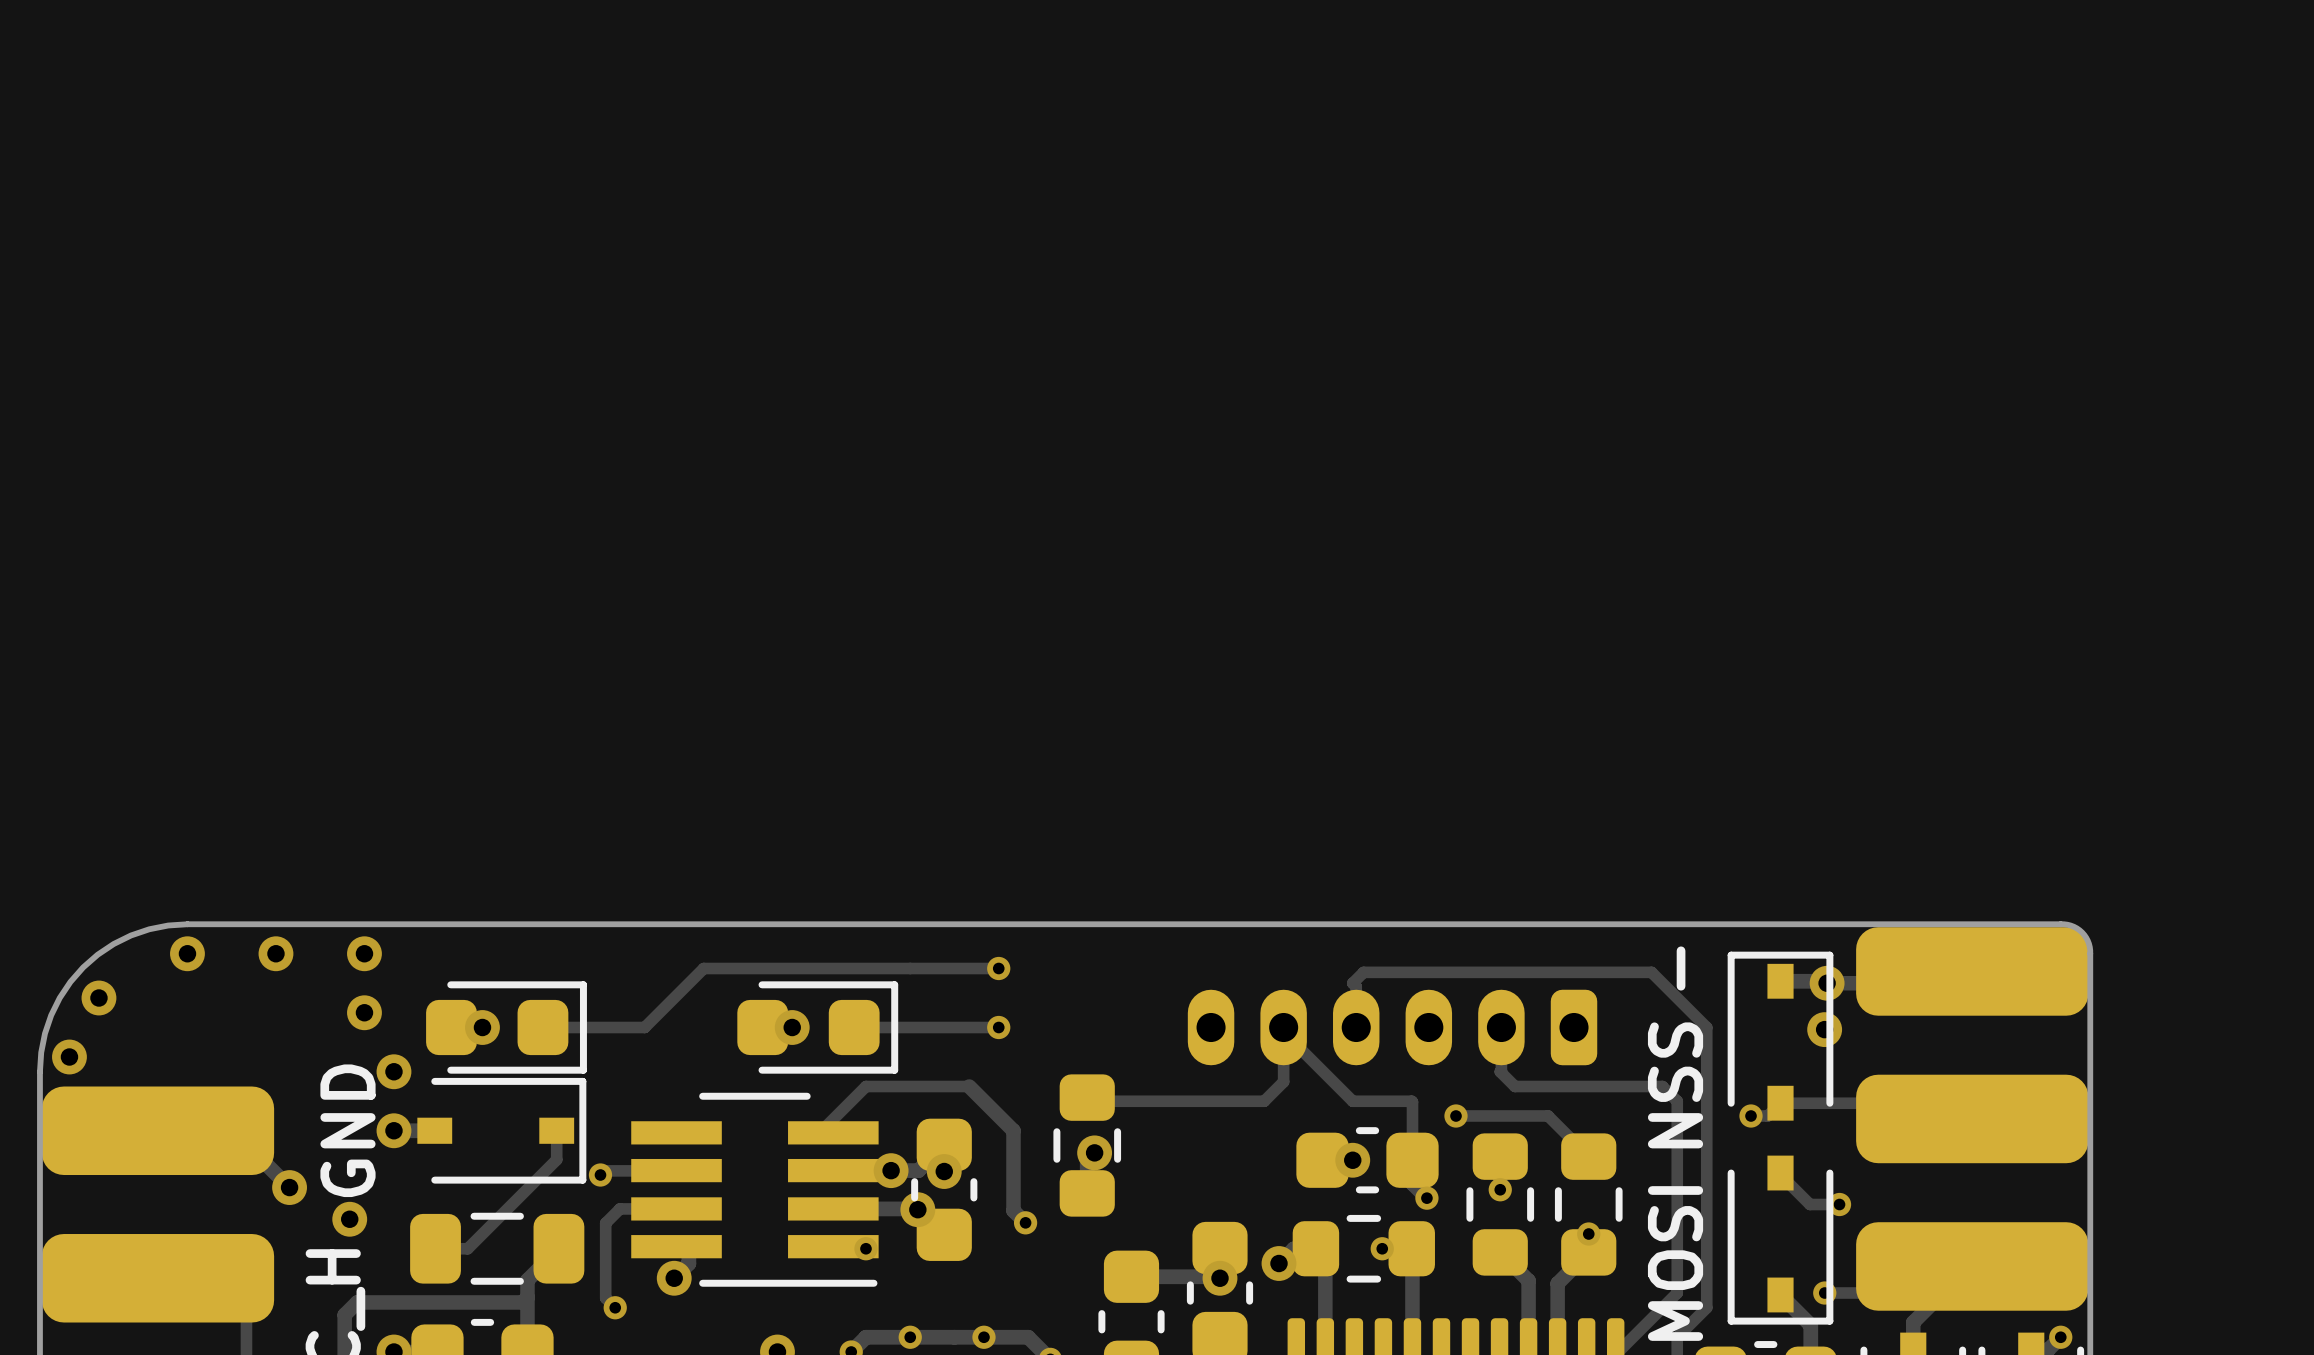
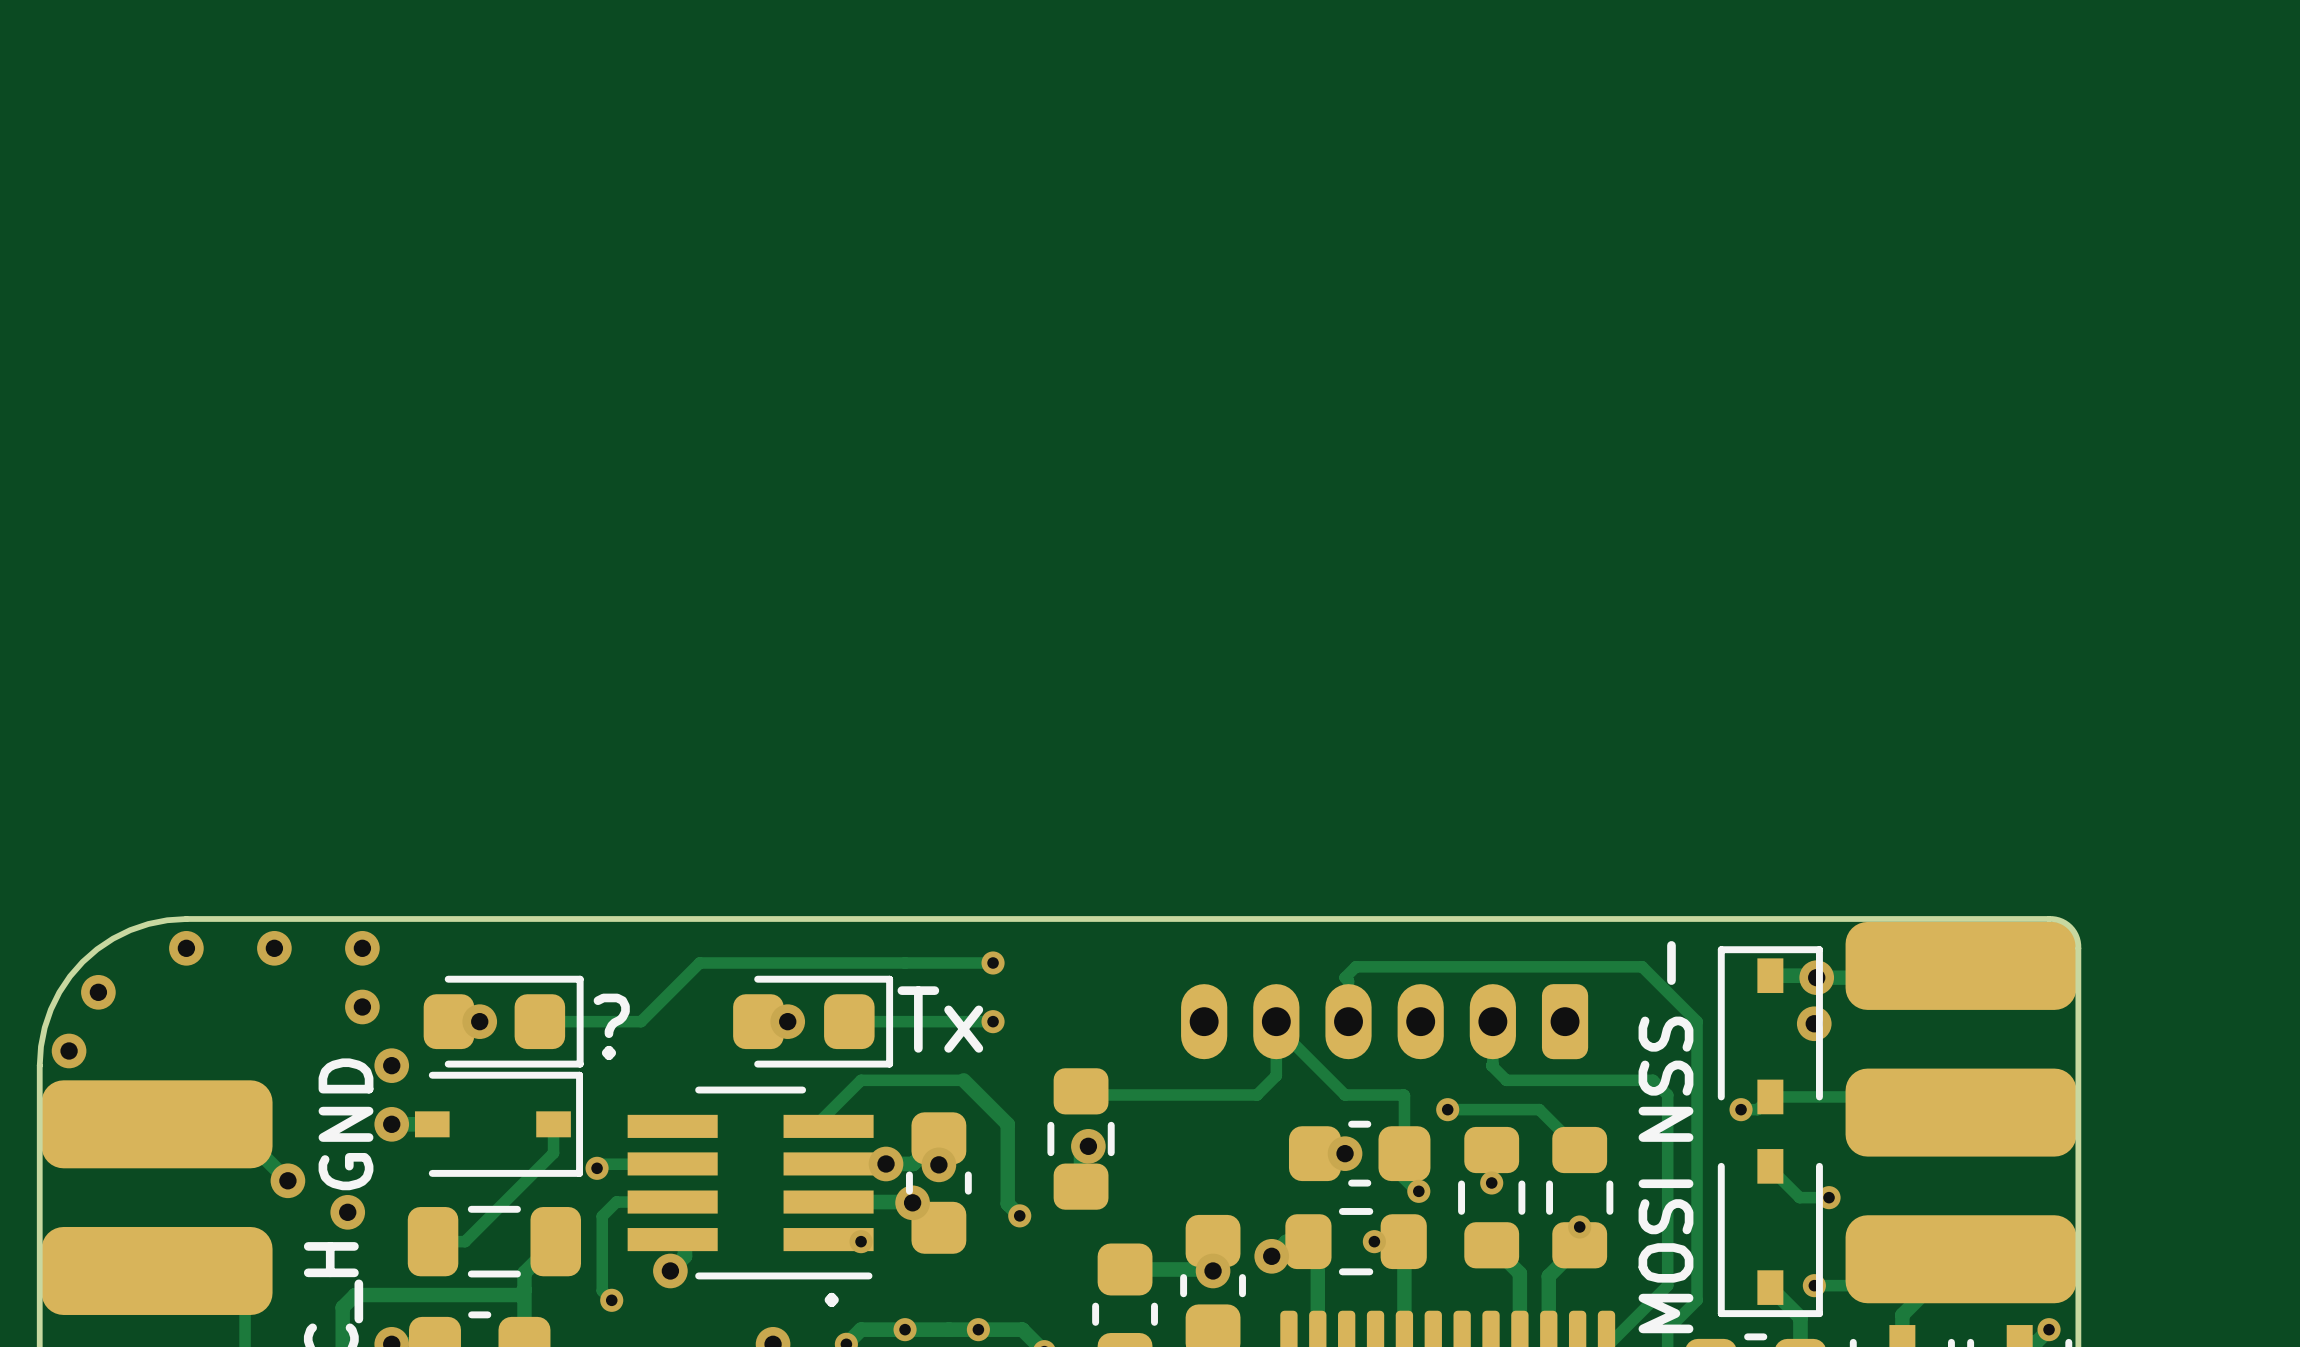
text: none -> Tx (940, 1019)
text: none -> ? (611, 1026)
text: none -> . (831, 1299)

